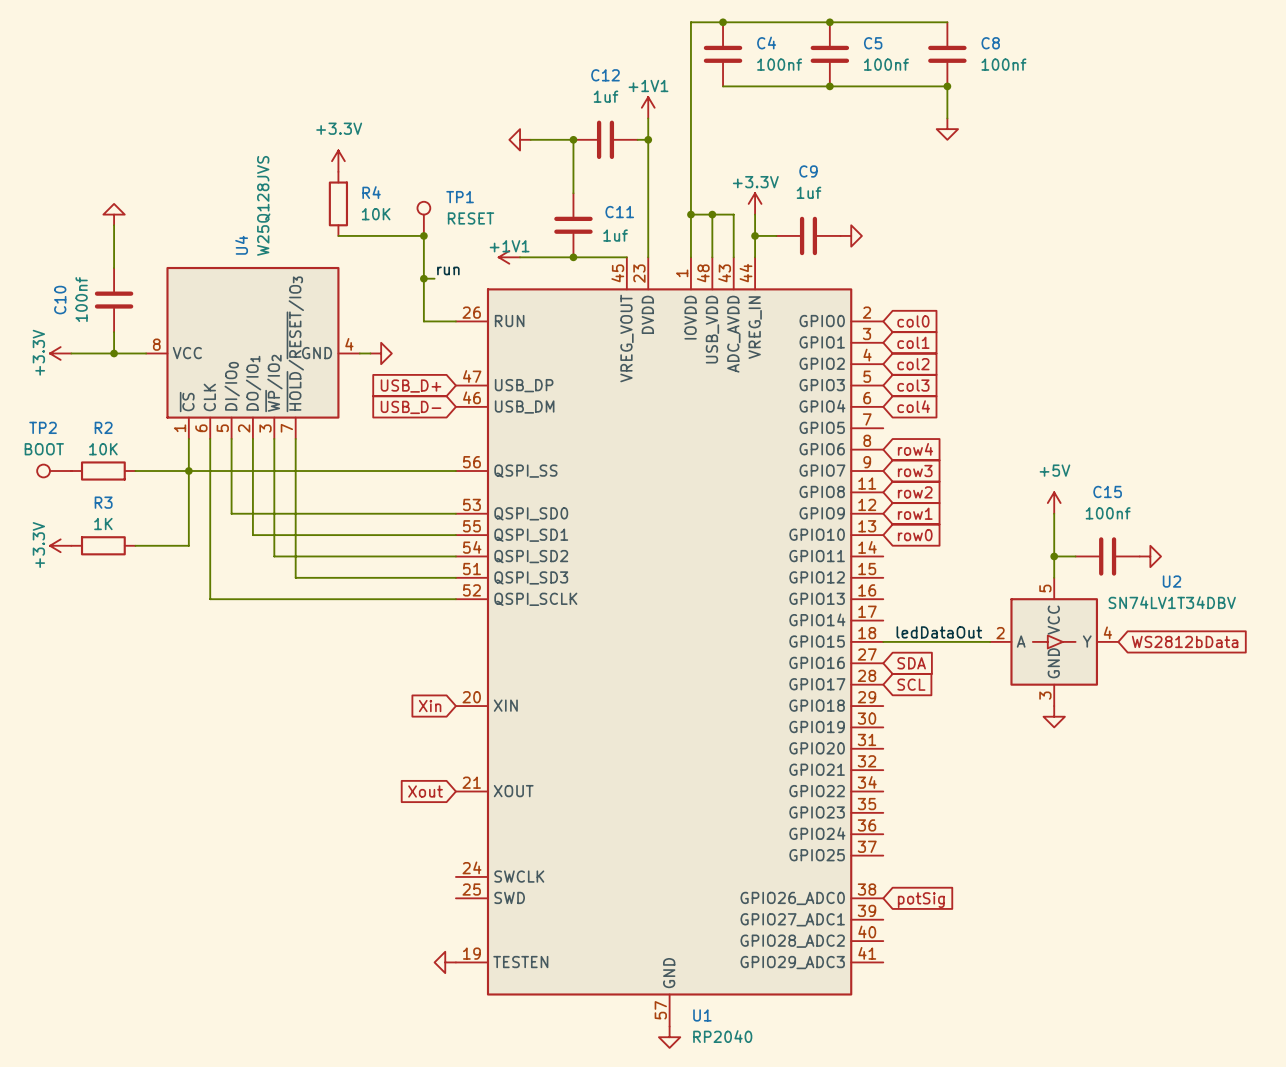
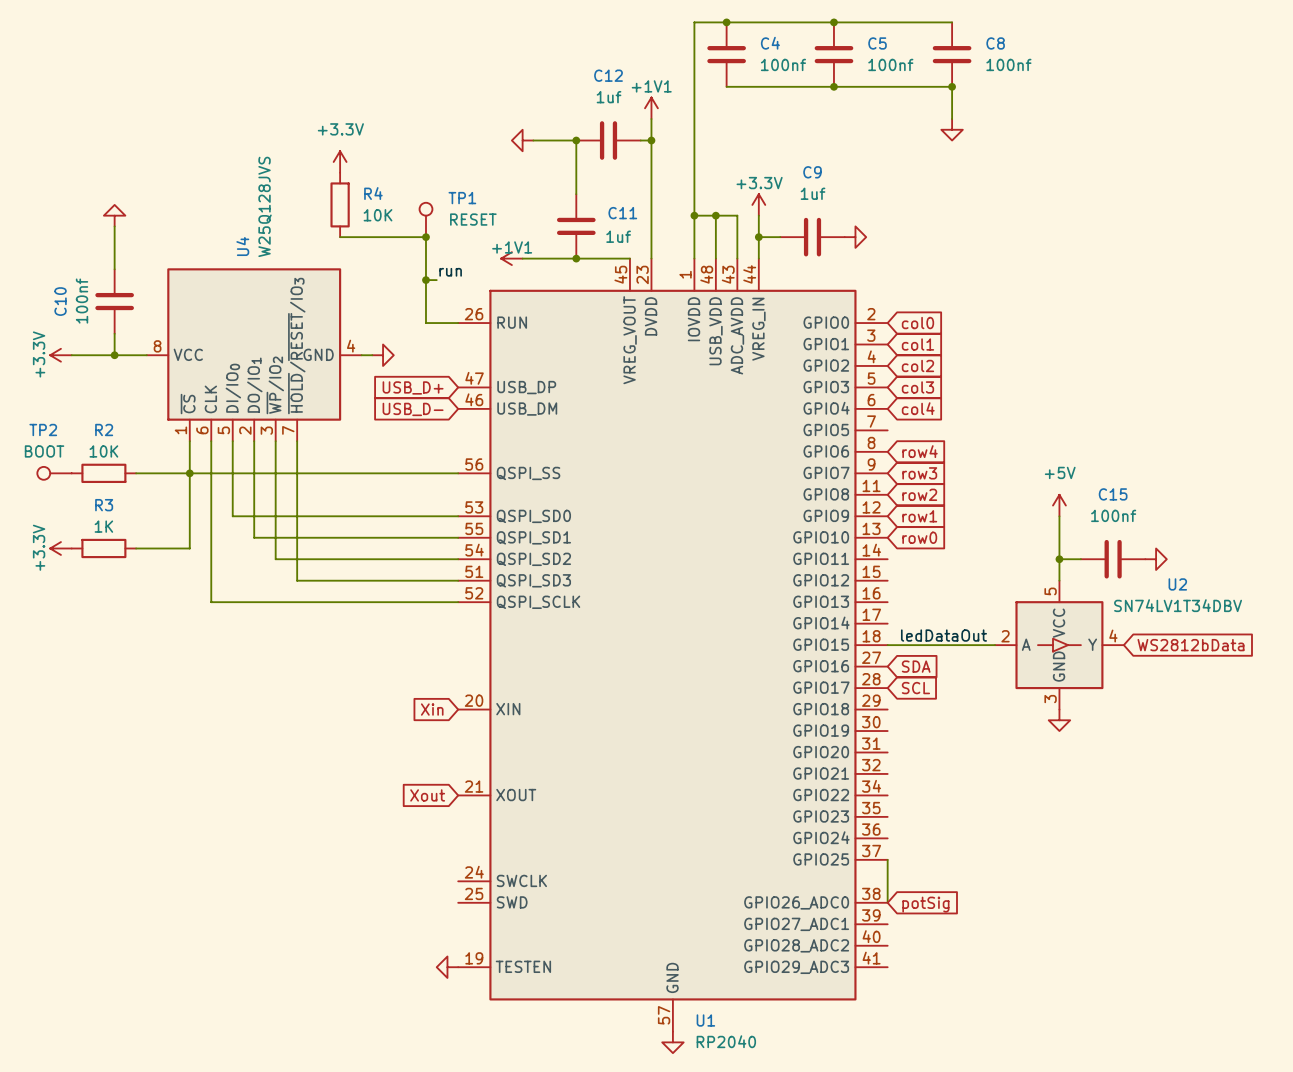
wire: none -> (887, 859) (887, 902)

